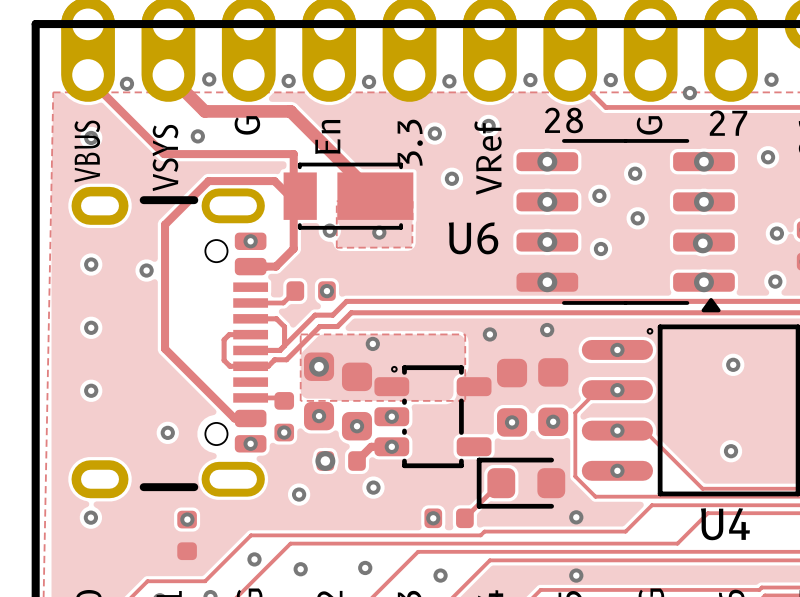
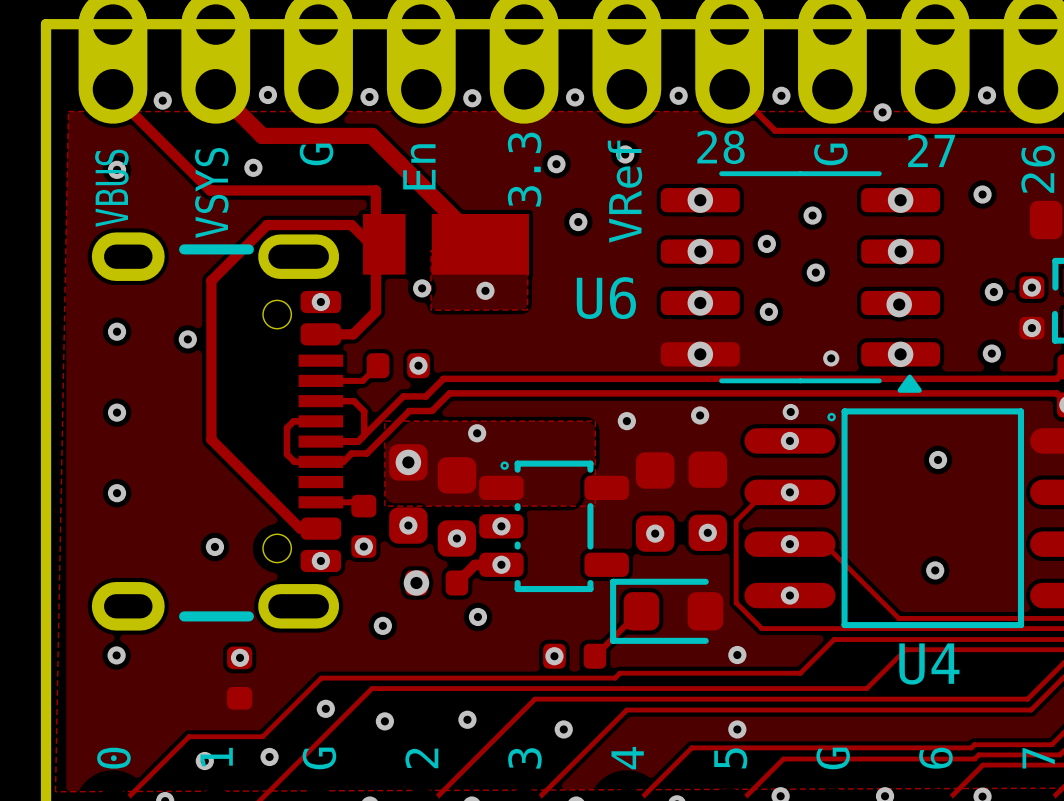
part footprint: [283, 162, 414, 230] -> [363, 213, 529, 275]
via: none -> (831, 358)
via: none -> (790, 412)

